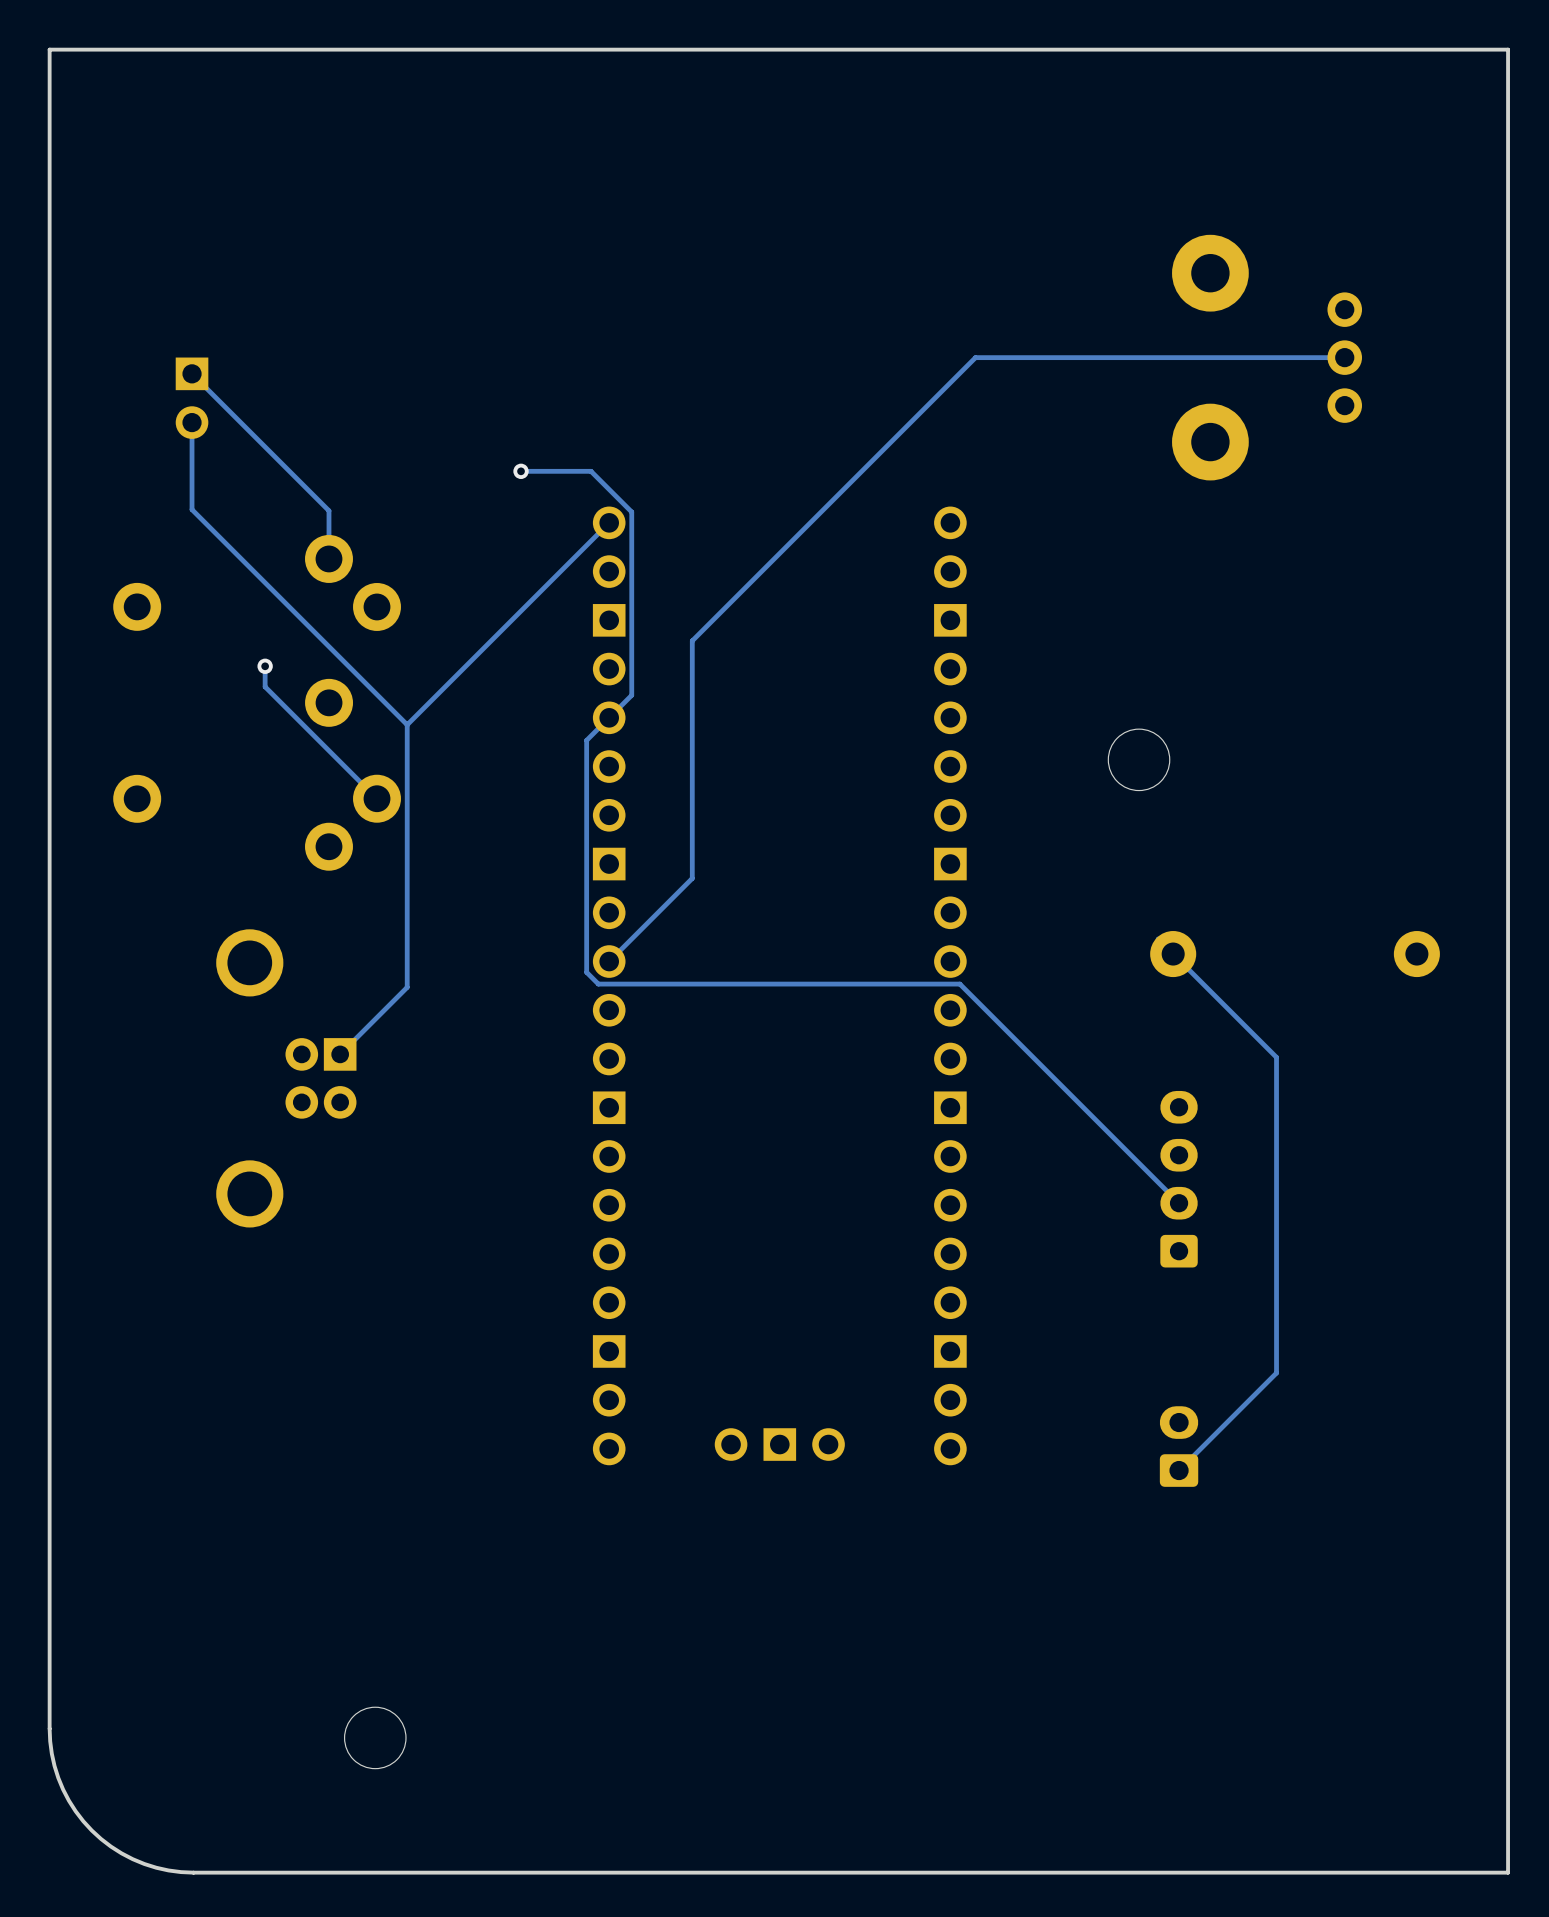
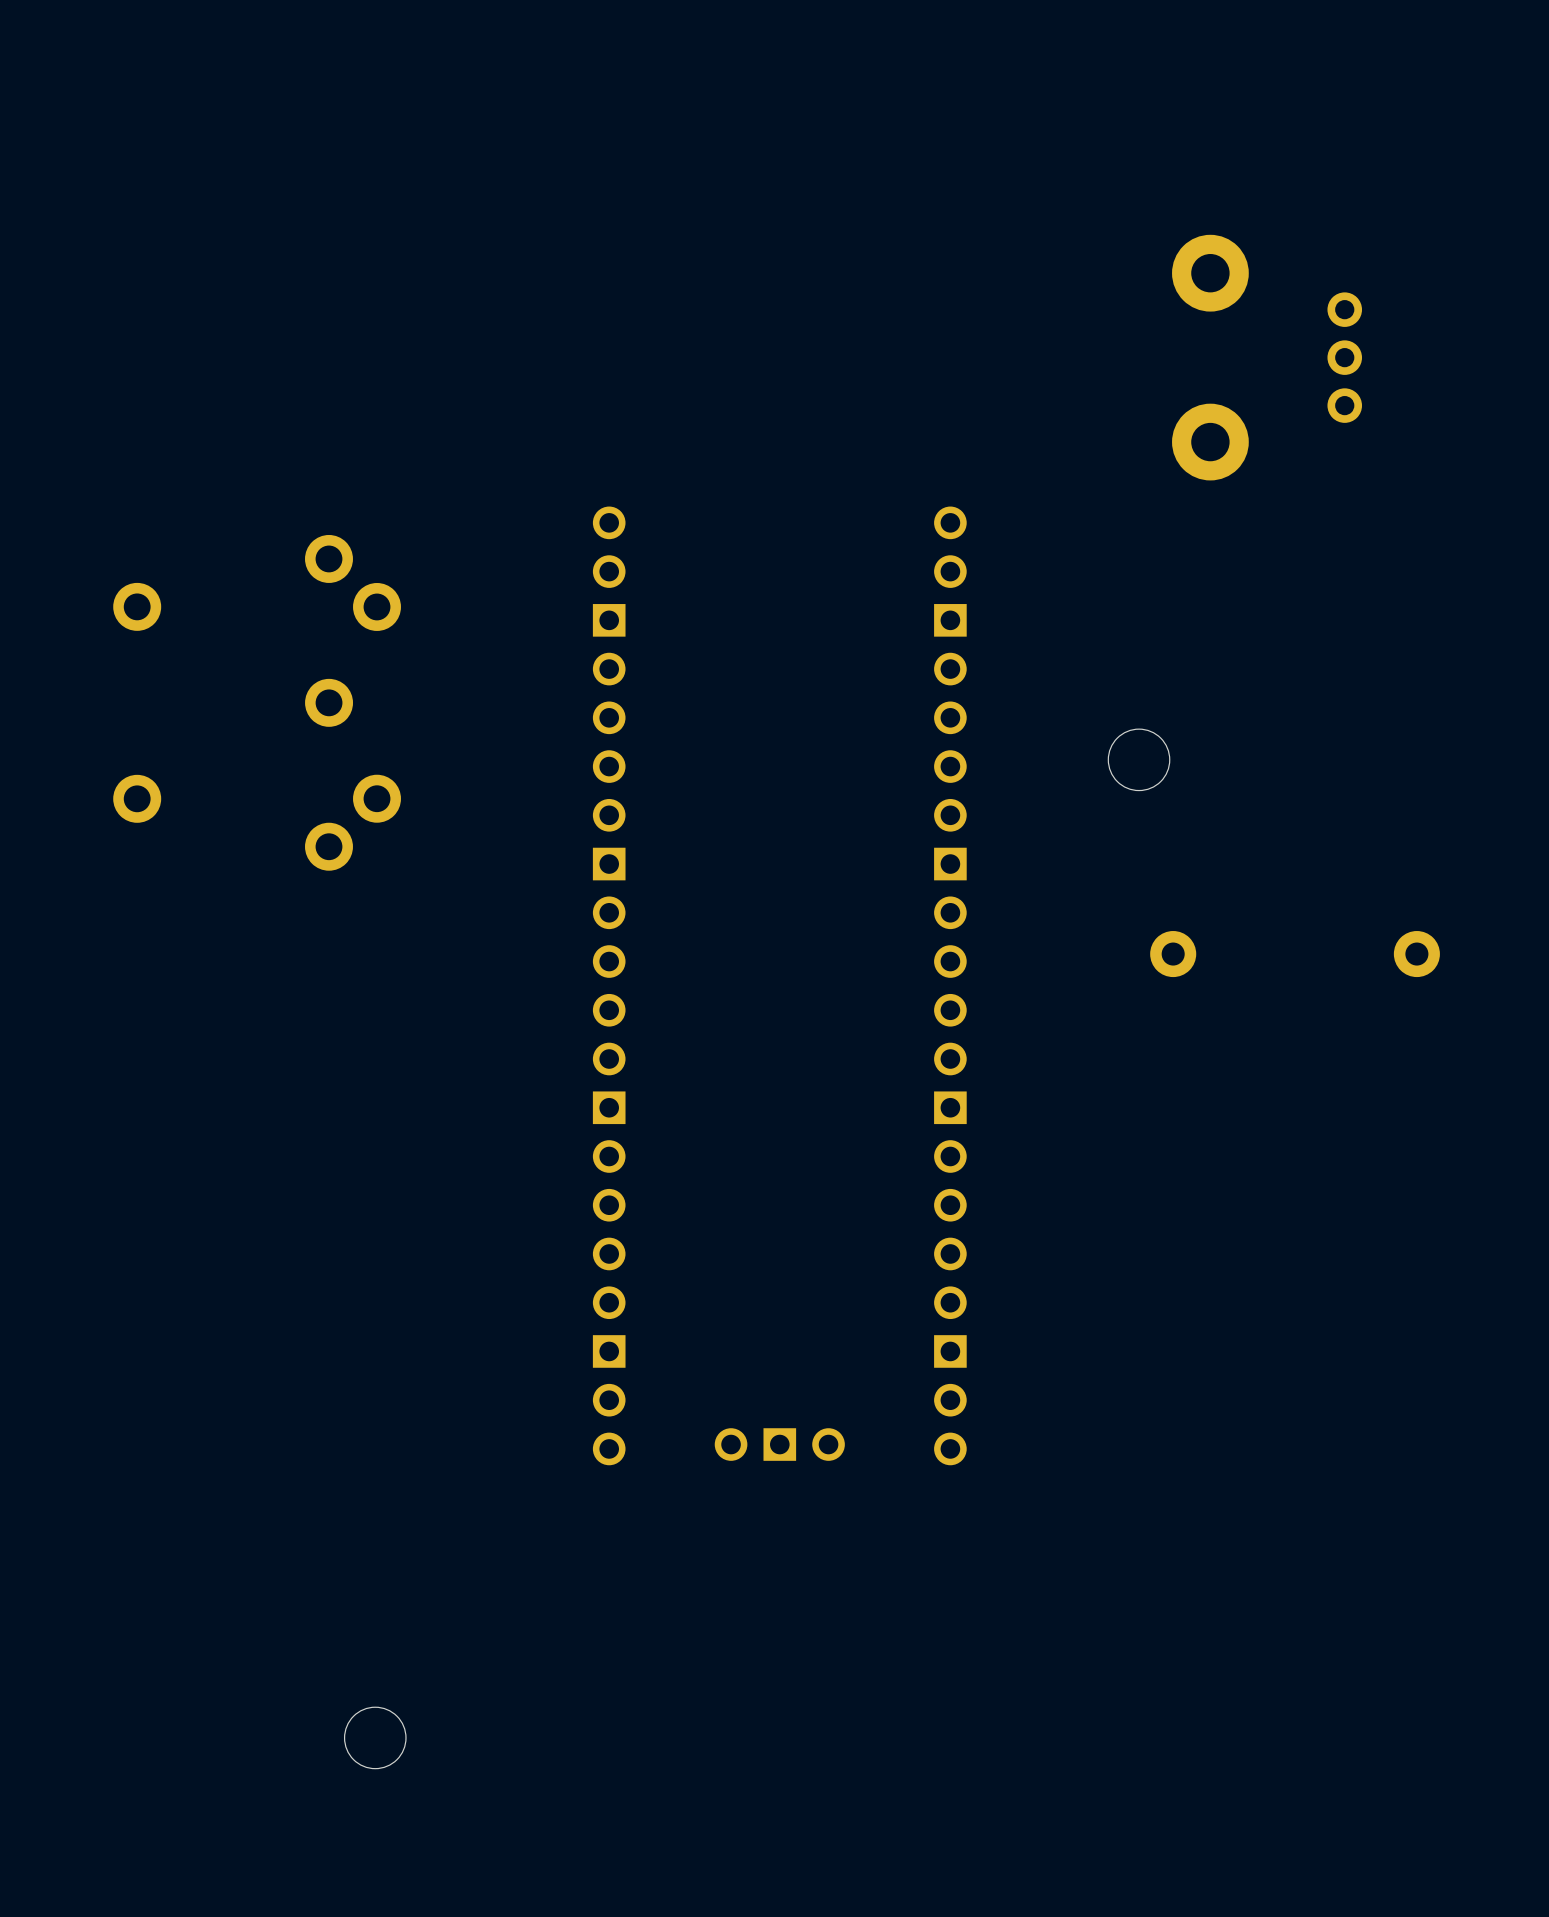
board edge: (1508, 49) (1508, 1872) (193, 1872) (168, 1870) (144, 1863) (121, 1853) (101, 1838) (75, 1811) (63, 1789) (54, 1765) (49, 1728) (49, 49) (1508, 49) -> none
track: (1344, 357) (975, 357) (692, 640) (692, 878) (609, 961) -> none
track: (192, 373) (328, 510) (328, 558) -> none
part: (192, 398) -> none
track: (192, 422) (192, 509) (407, 724) -> none
track: (521, 471) (591, 471) (631, 512) (631, 695) (586, 740) (586, 972) (598, 984) (959, 984) (1179, 1203) -> none
via: (521, 471) -> none
track: (609, 522) (407, 724) -> none
track: (265, 666) (265, 686) (377, 798) -> none
via: (265, 666) -> none
track: (407, 724) (407, 987) (340, 1054) -> none
track: (1158, 938) (1276, 1057) (1276, 1373) (1179, 1470) -> none
part: (286, 1078) -> none
part: (1179, 1179) -> none
part: (1179, 1446) -> none

